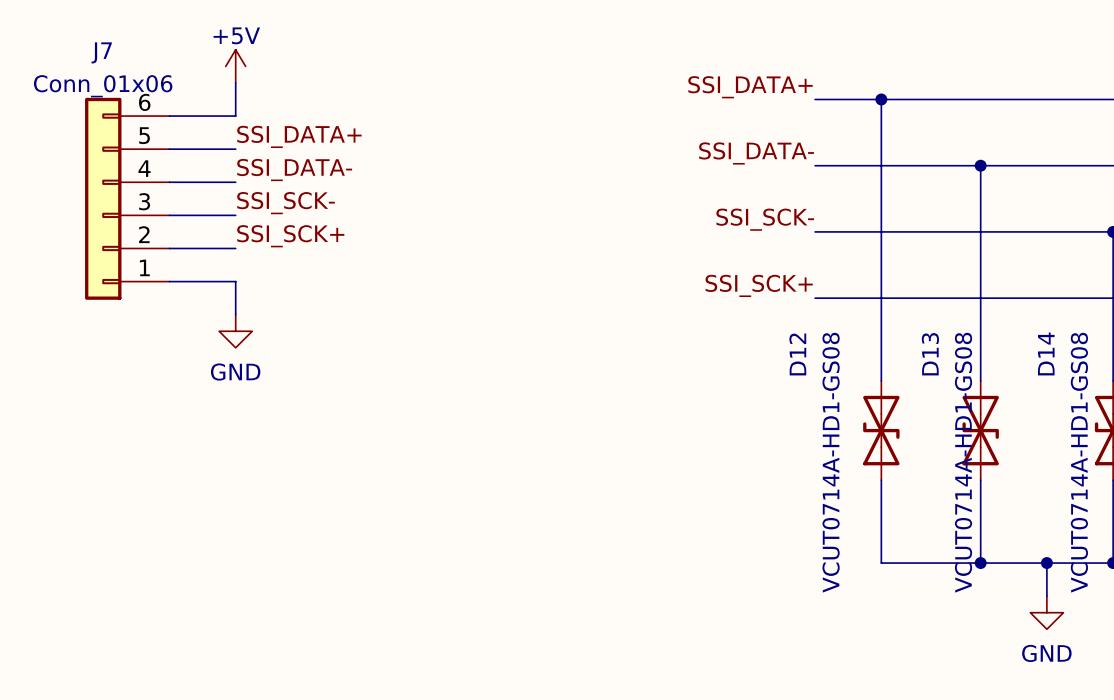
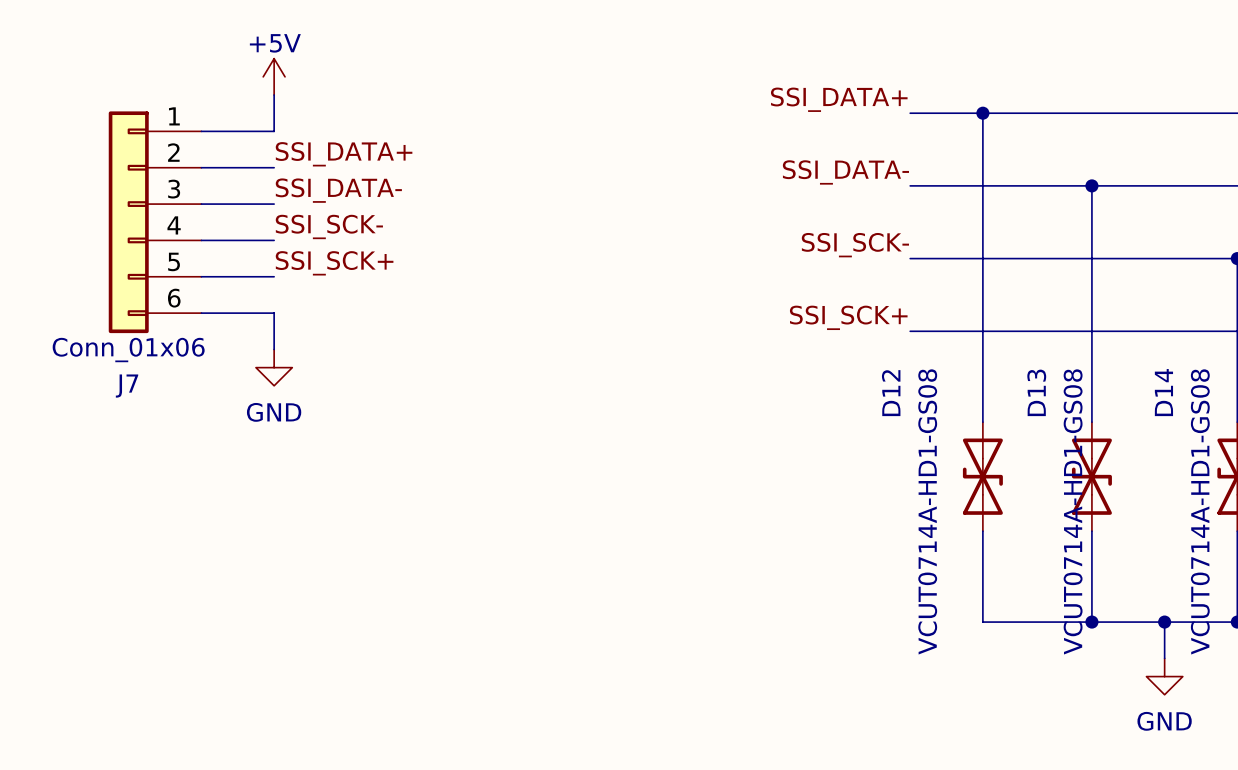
J7 flip: as is (103, 198) -> up-down (128, 222)

